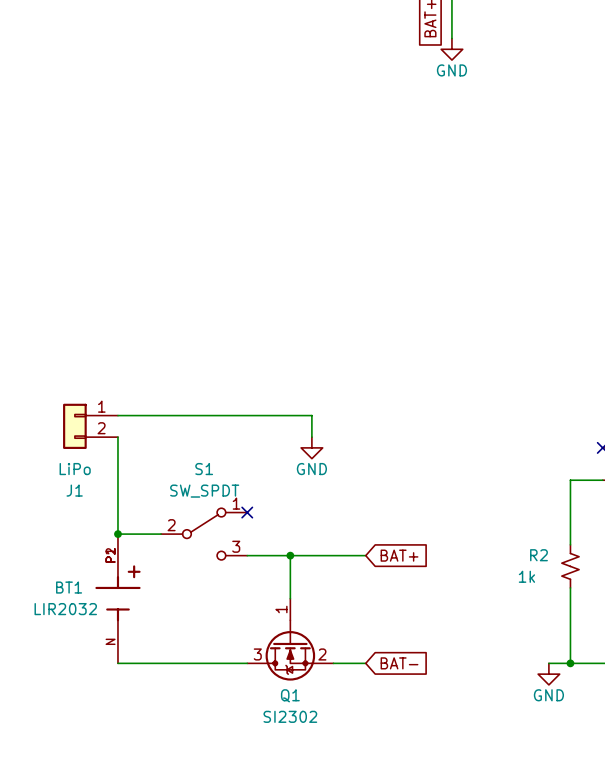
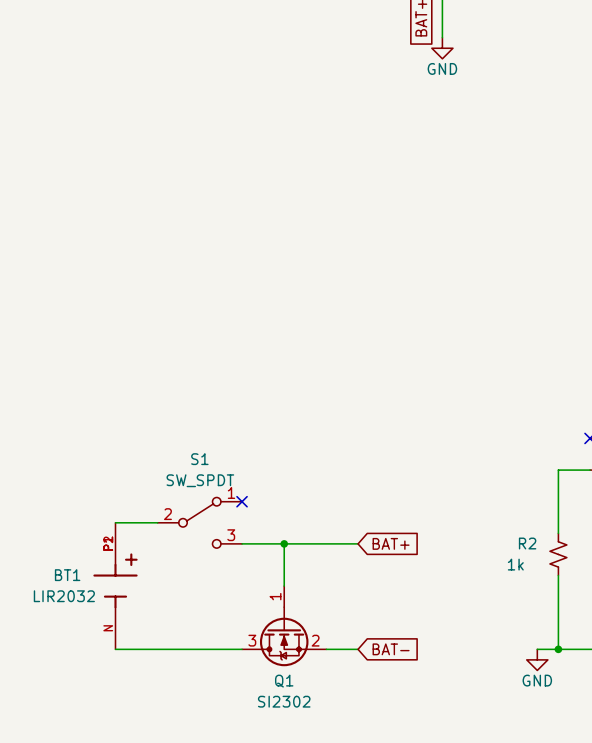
wire: (117, 415) (311, 415) (311, 437) -> none
J1: LiPo (90, 426) -> none
wire: (117, 437) (117, 534) -> none
power symbol: GND (311, 447) -> none
junction: (117, 534) -> none

